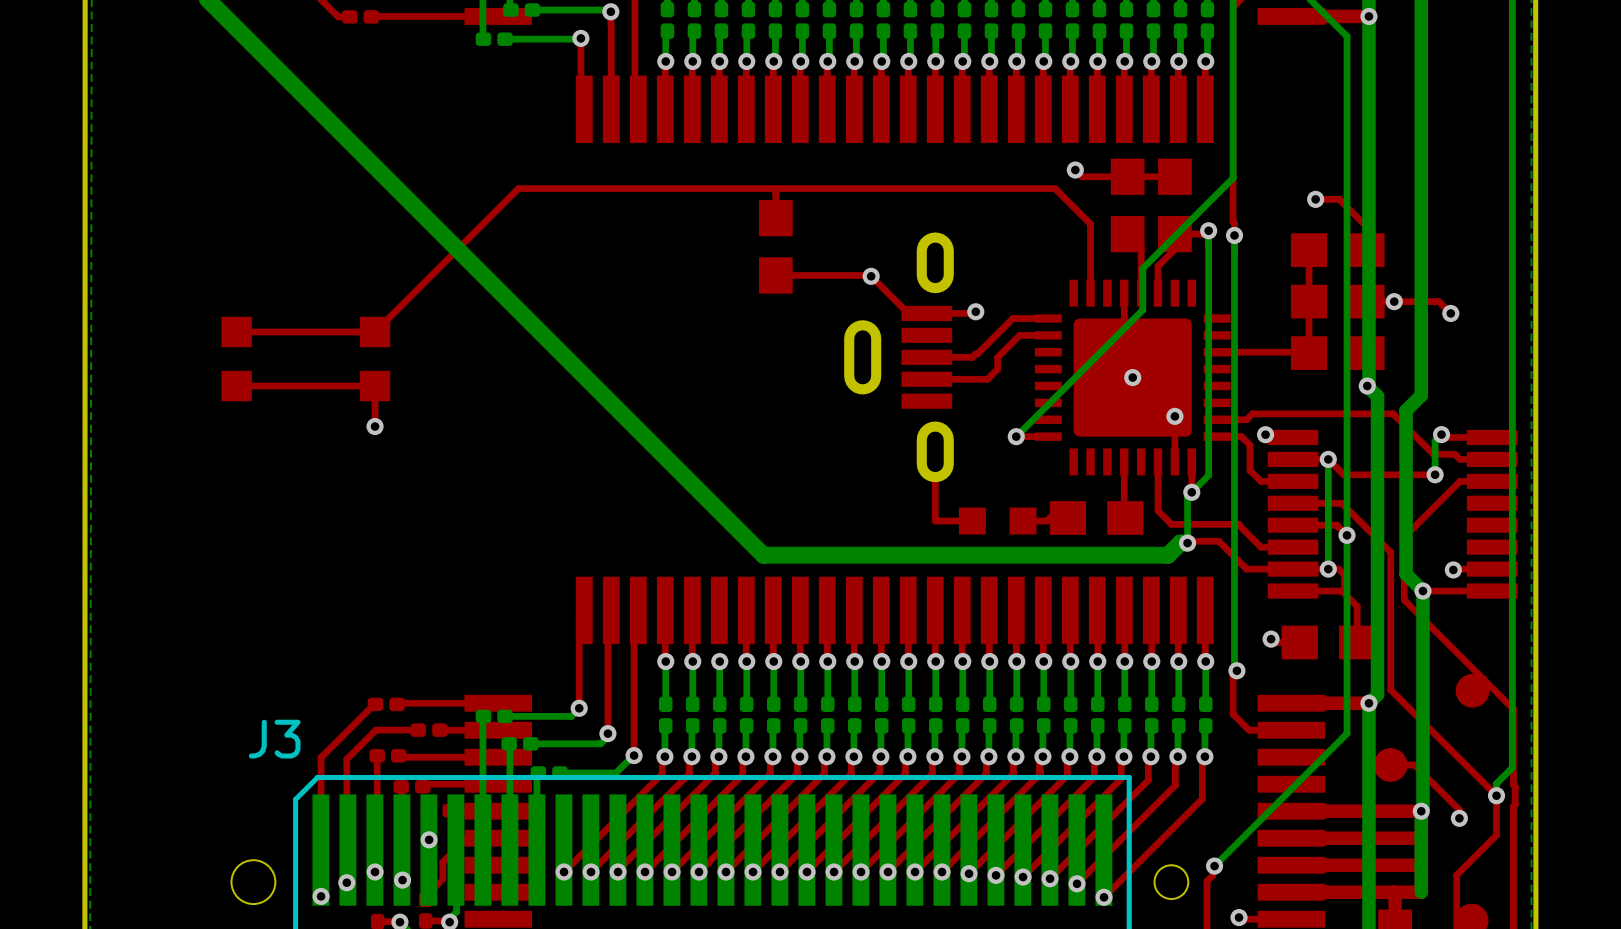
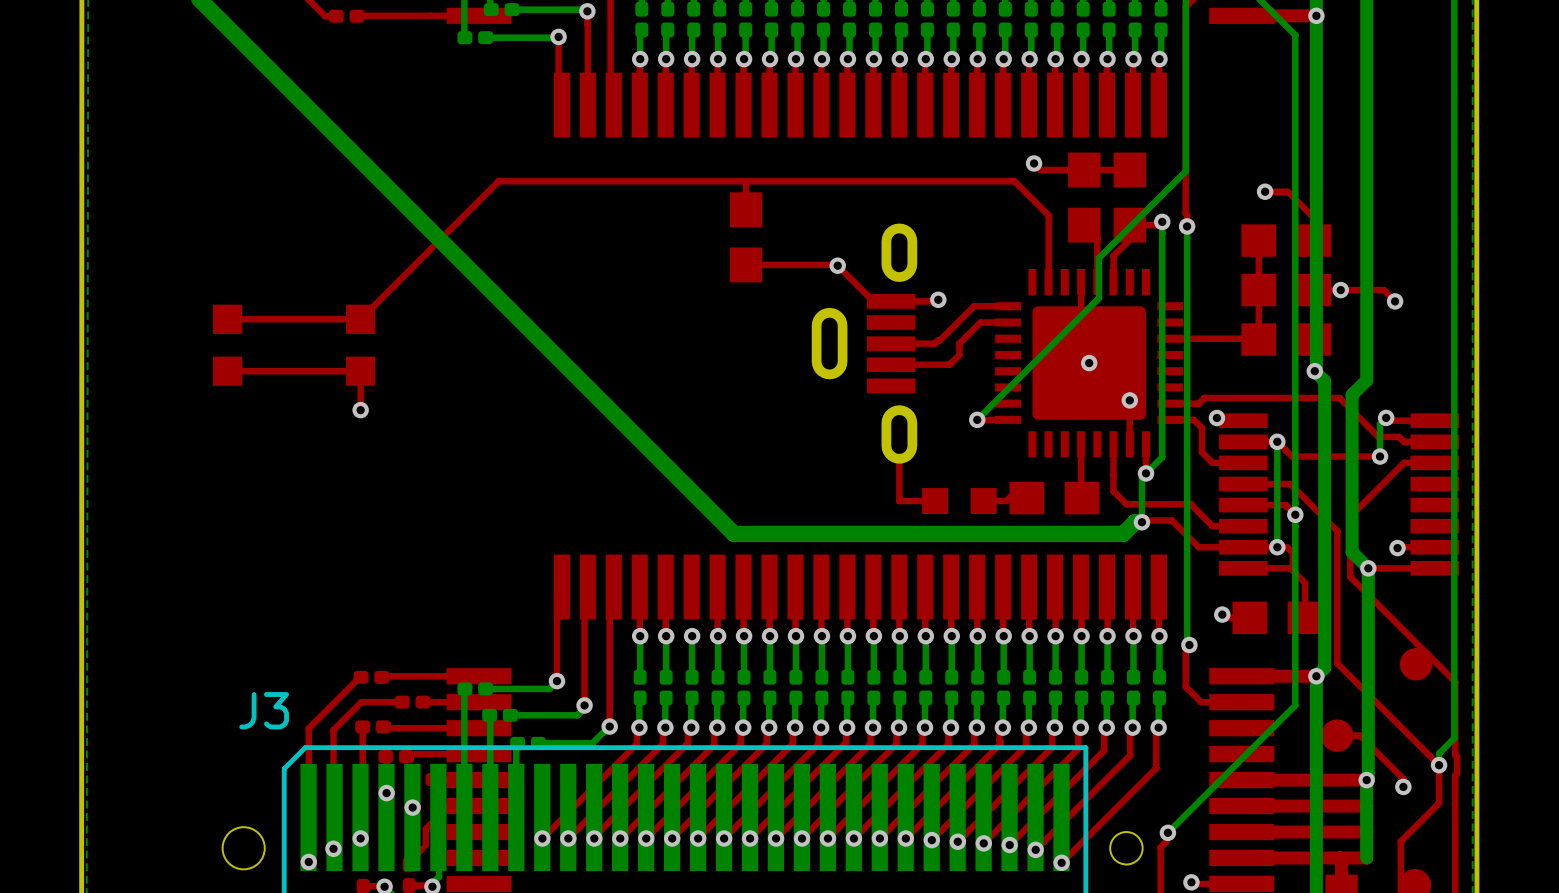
via position: (402, 880) -> (386, 793)

